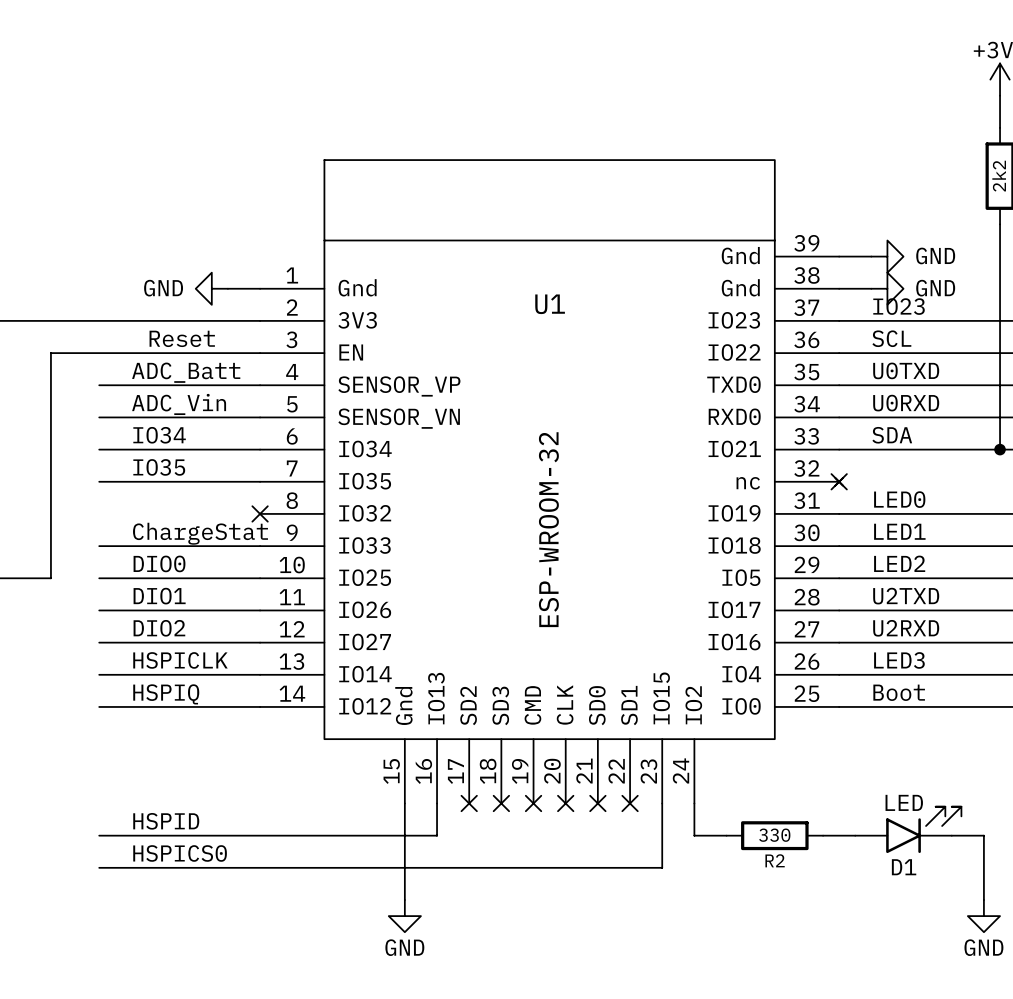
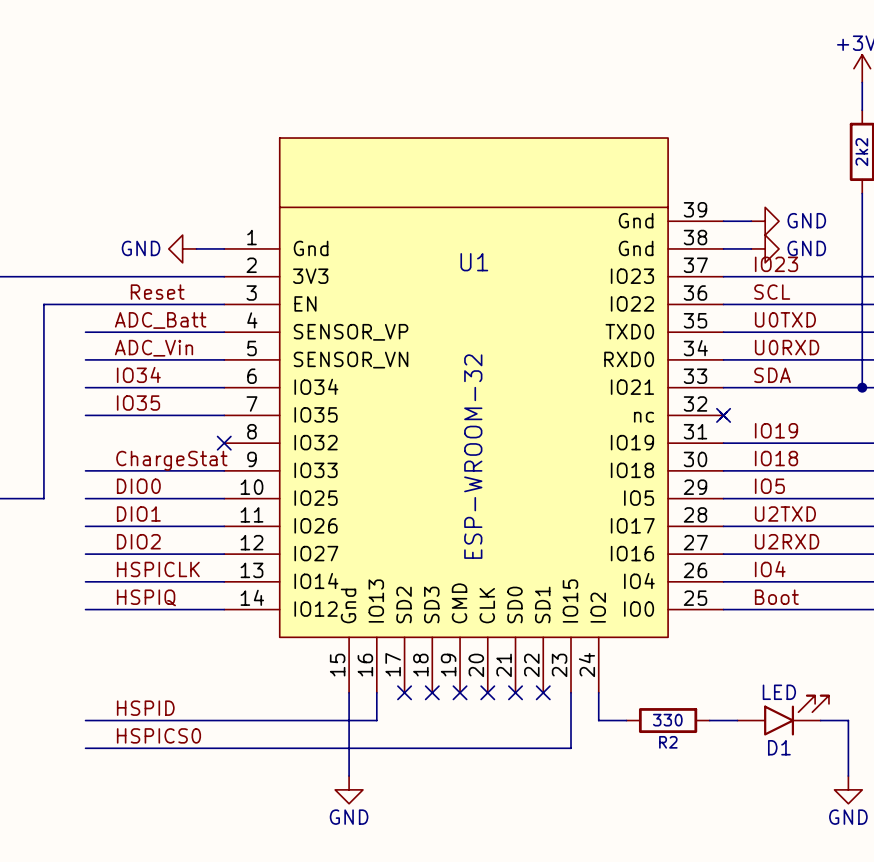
label: LED0 (899, 499) -> IO19 (776, 430)
label: LED1 (899, 531) -> IO18 (776, 458)
label: LED2 (899, 563) -> IO5 (769, 486)
label: LED3 (899, 660) -> IO4 (770, 569)

